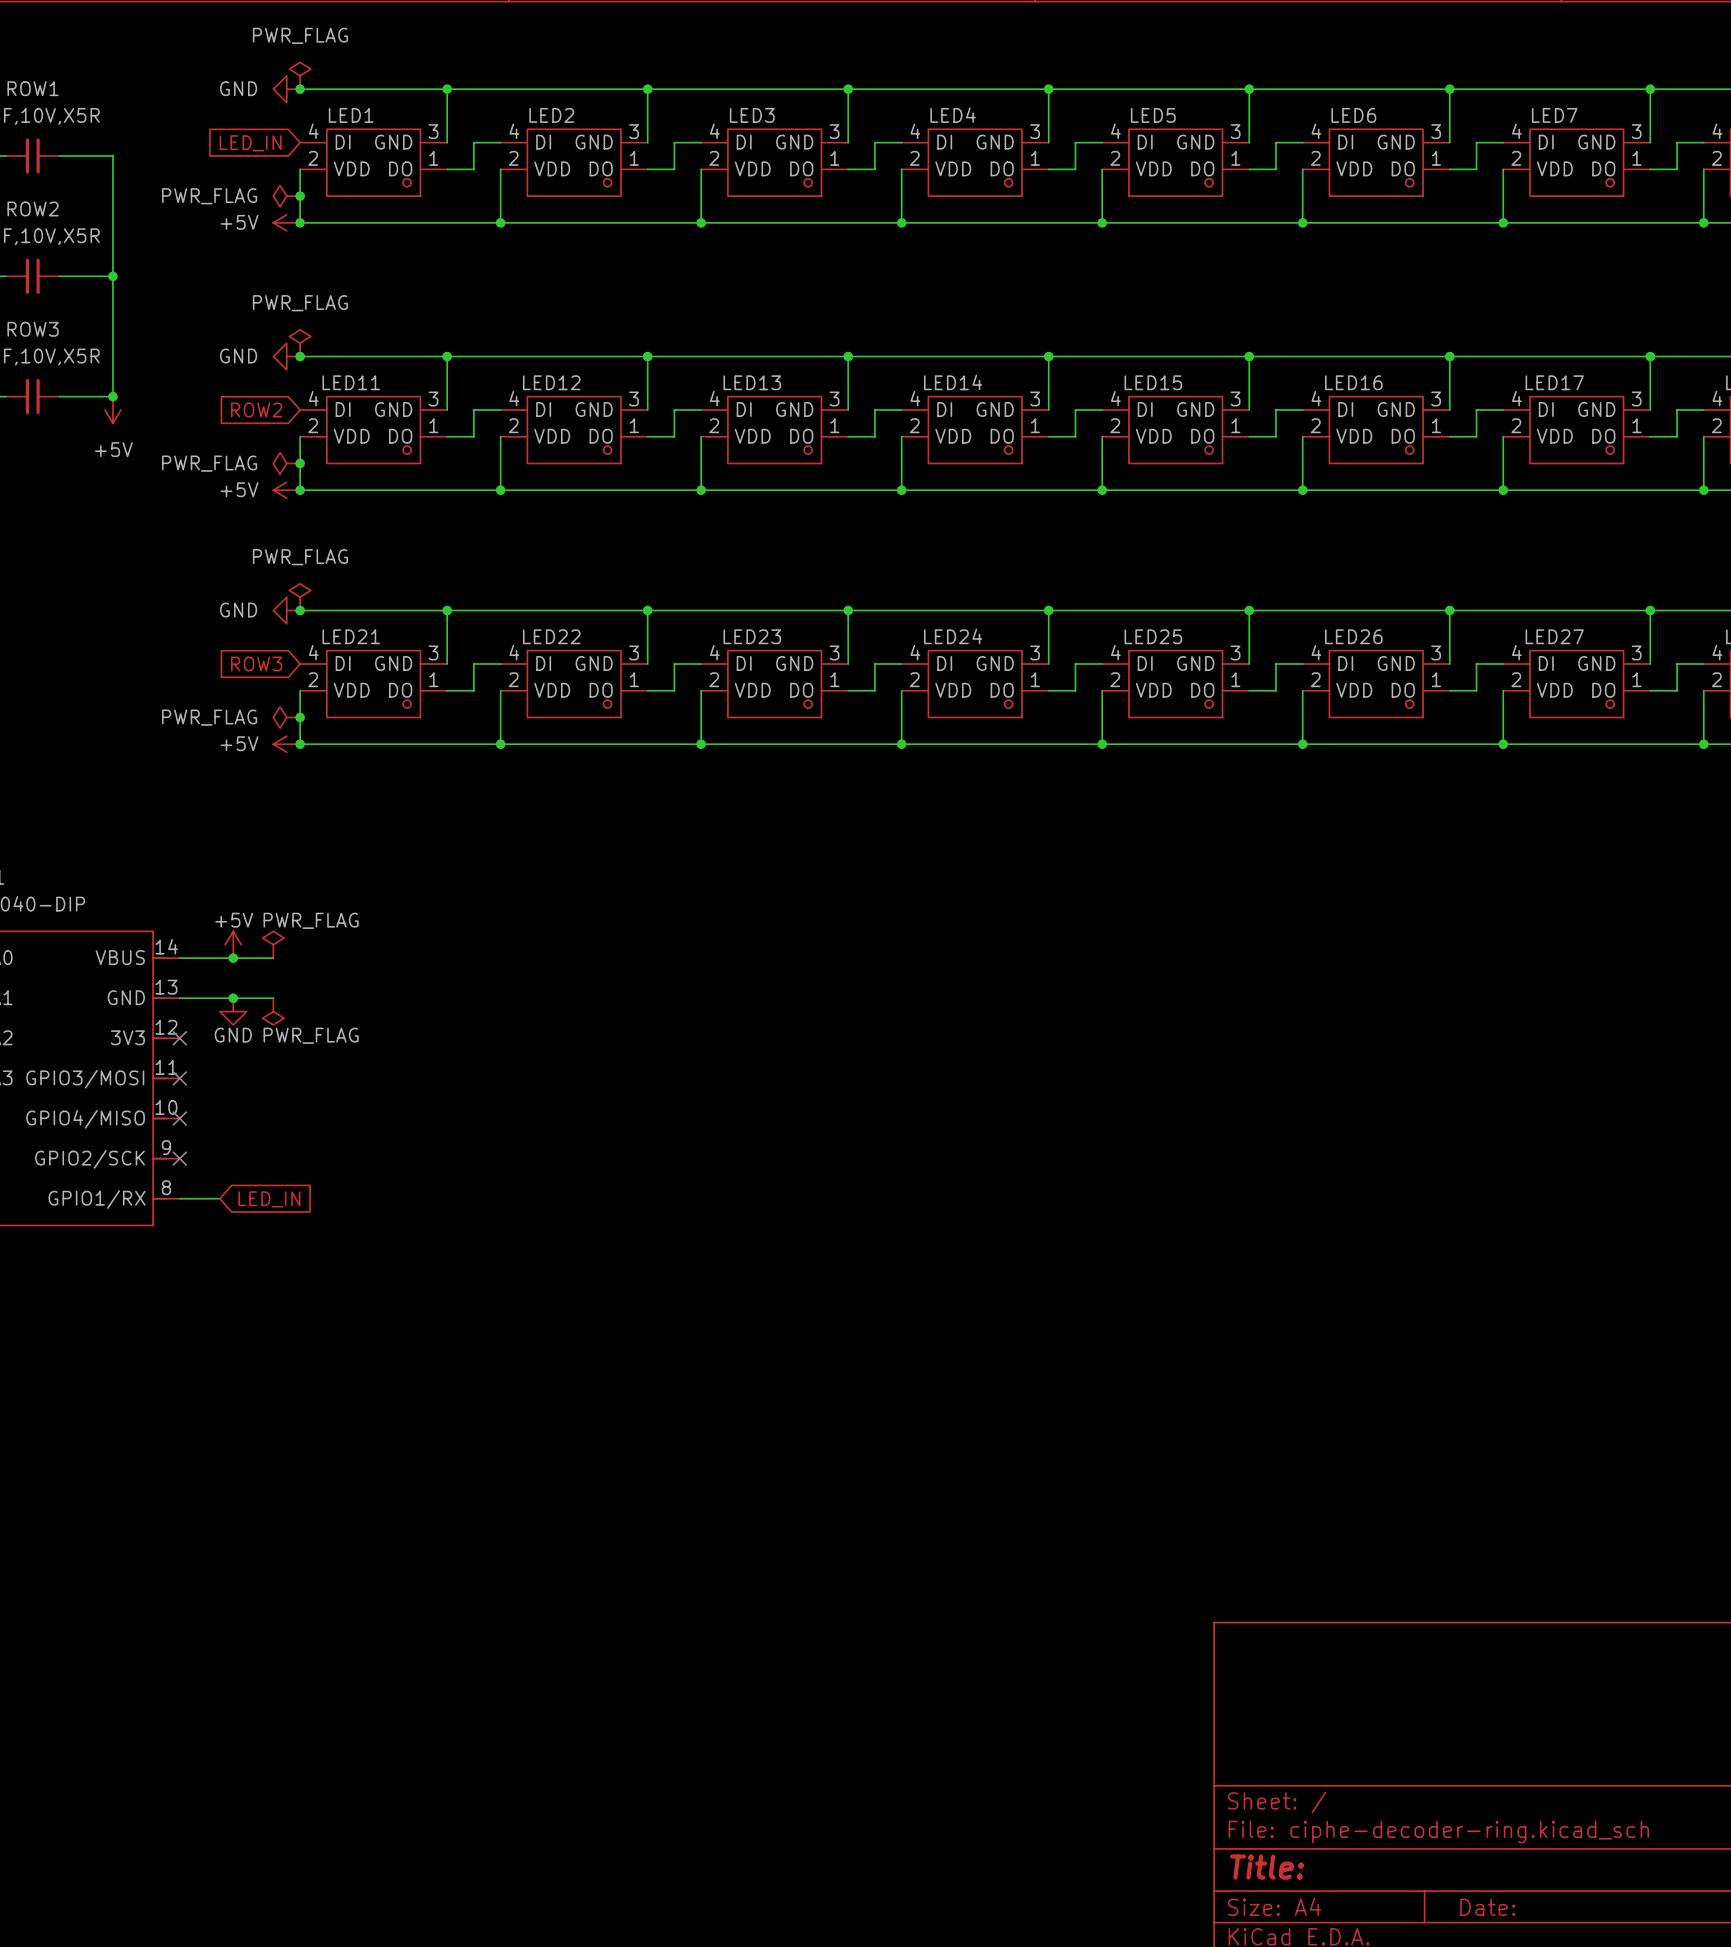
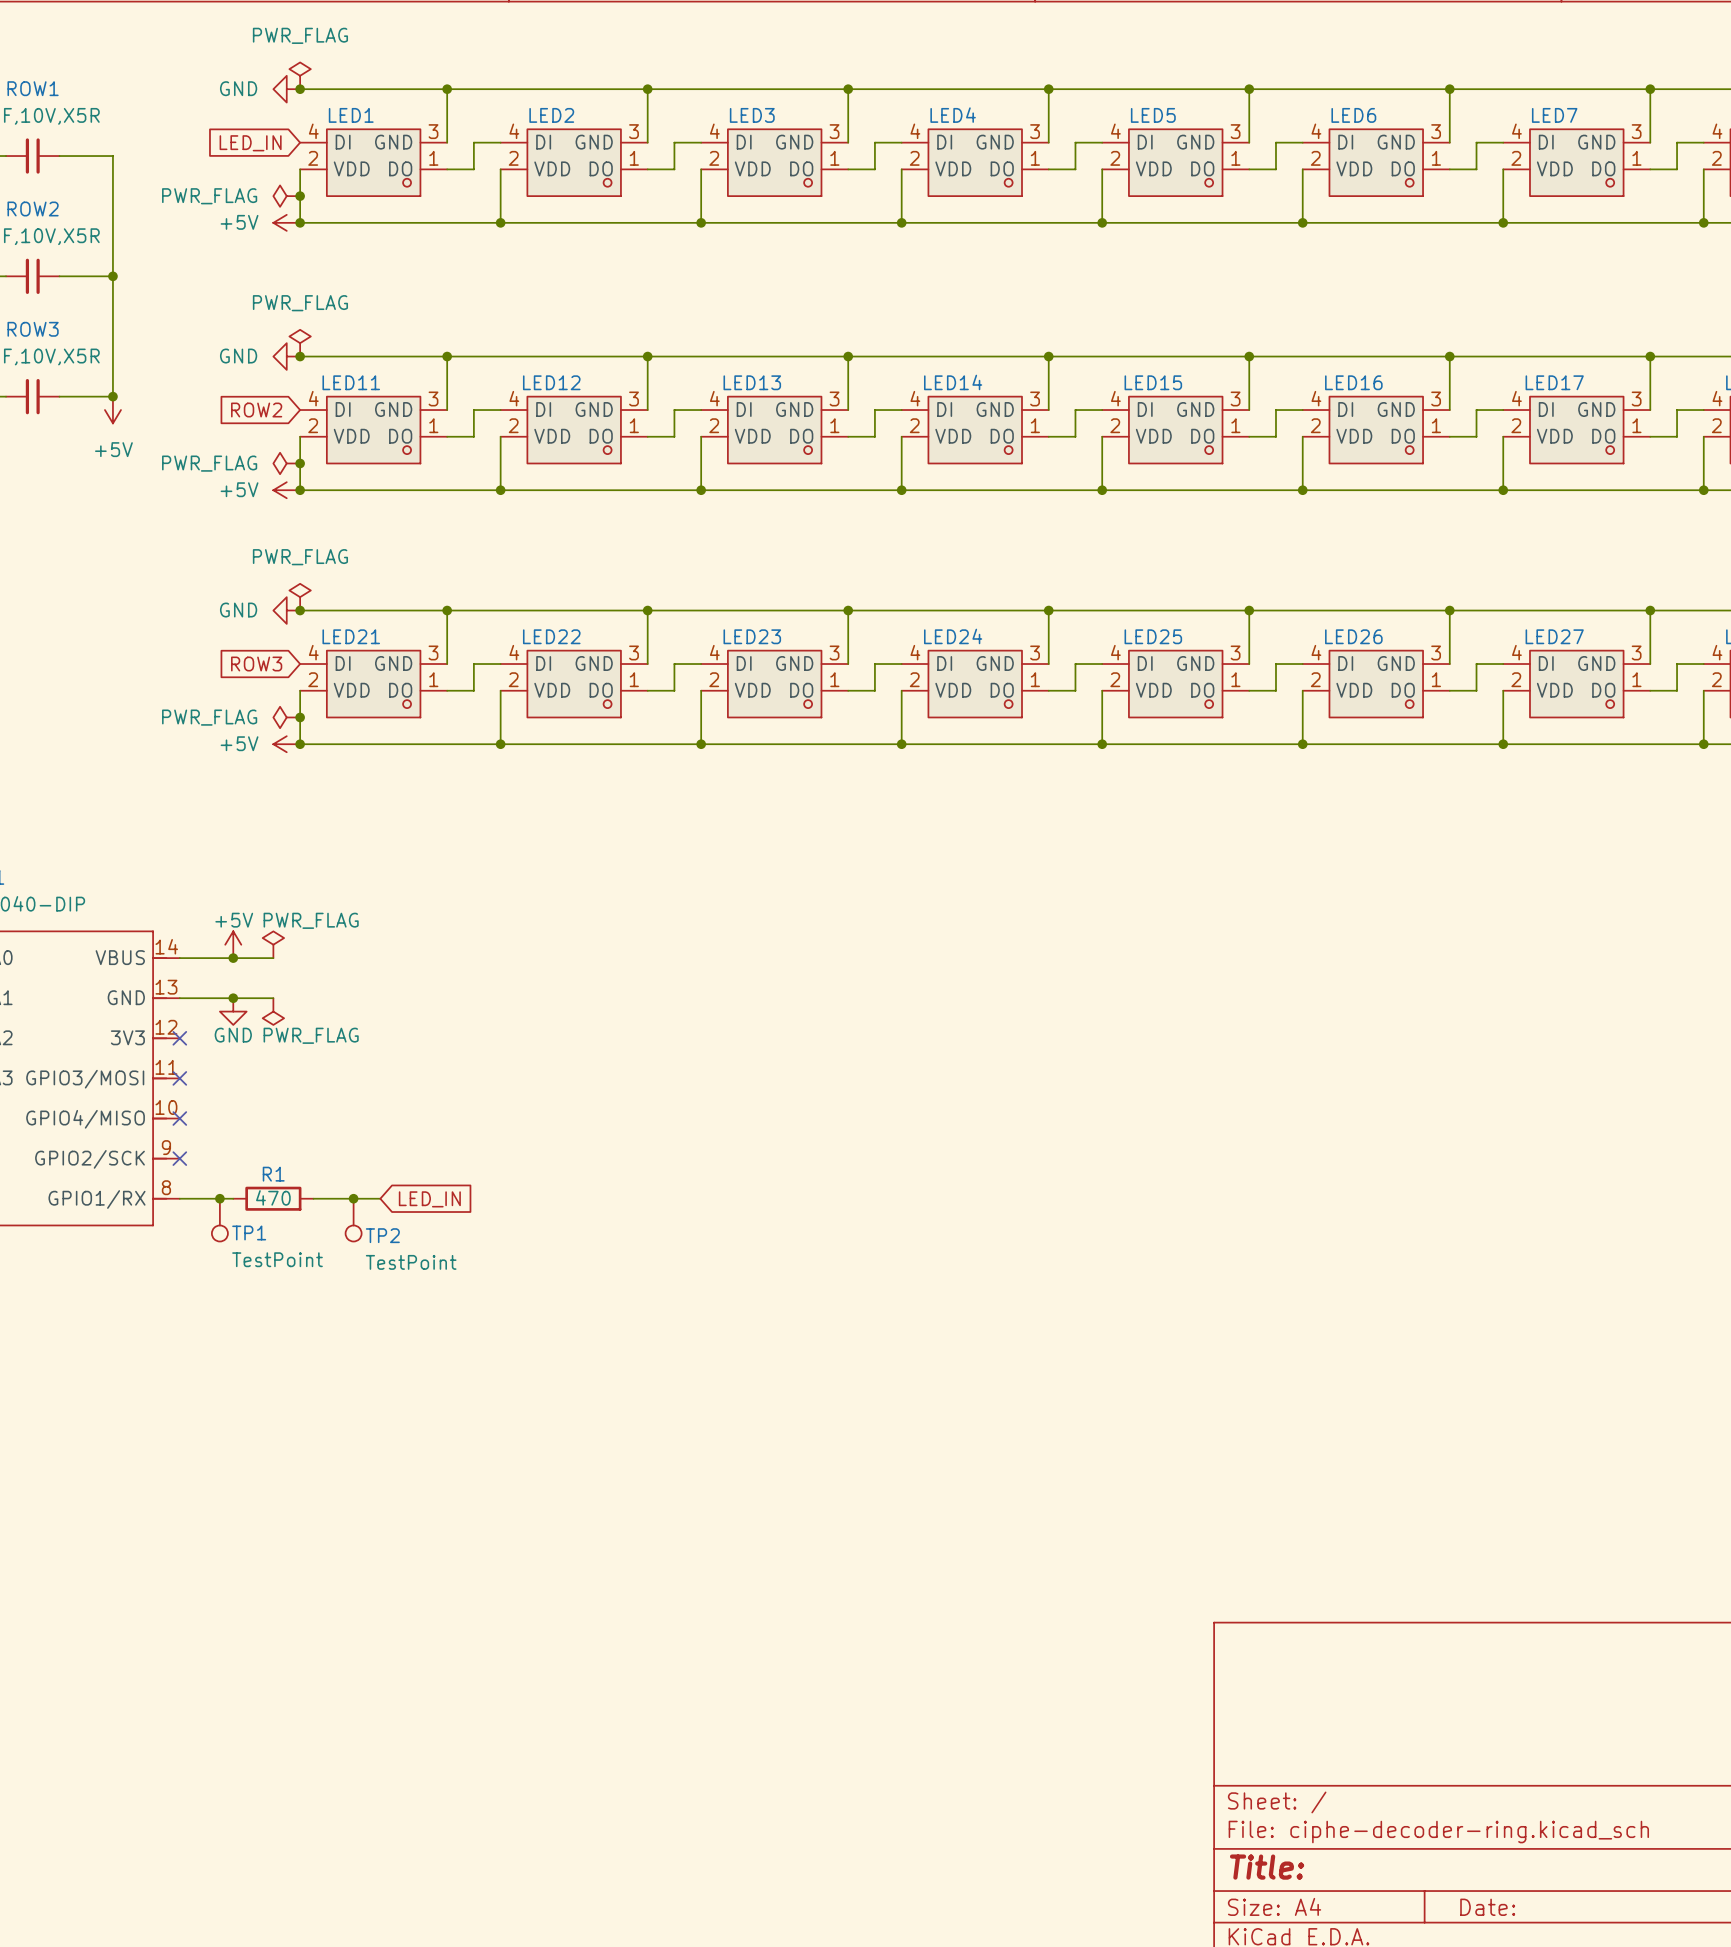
wire: none -> (219, 1198) (233, 1198)
junction: none -> (219, 1198)
R1: none -> 470 (273, 1198)
wire: none -> (313, 1198) (380, 1198)
junction: none -> (353, 1198)
global label position: LED_IN (269, 1199) -> LED_IN (429, 1199)
TP1: none -> TestPoint (219, 1220)
TP2: none -> TestPoint (353, 1220)

